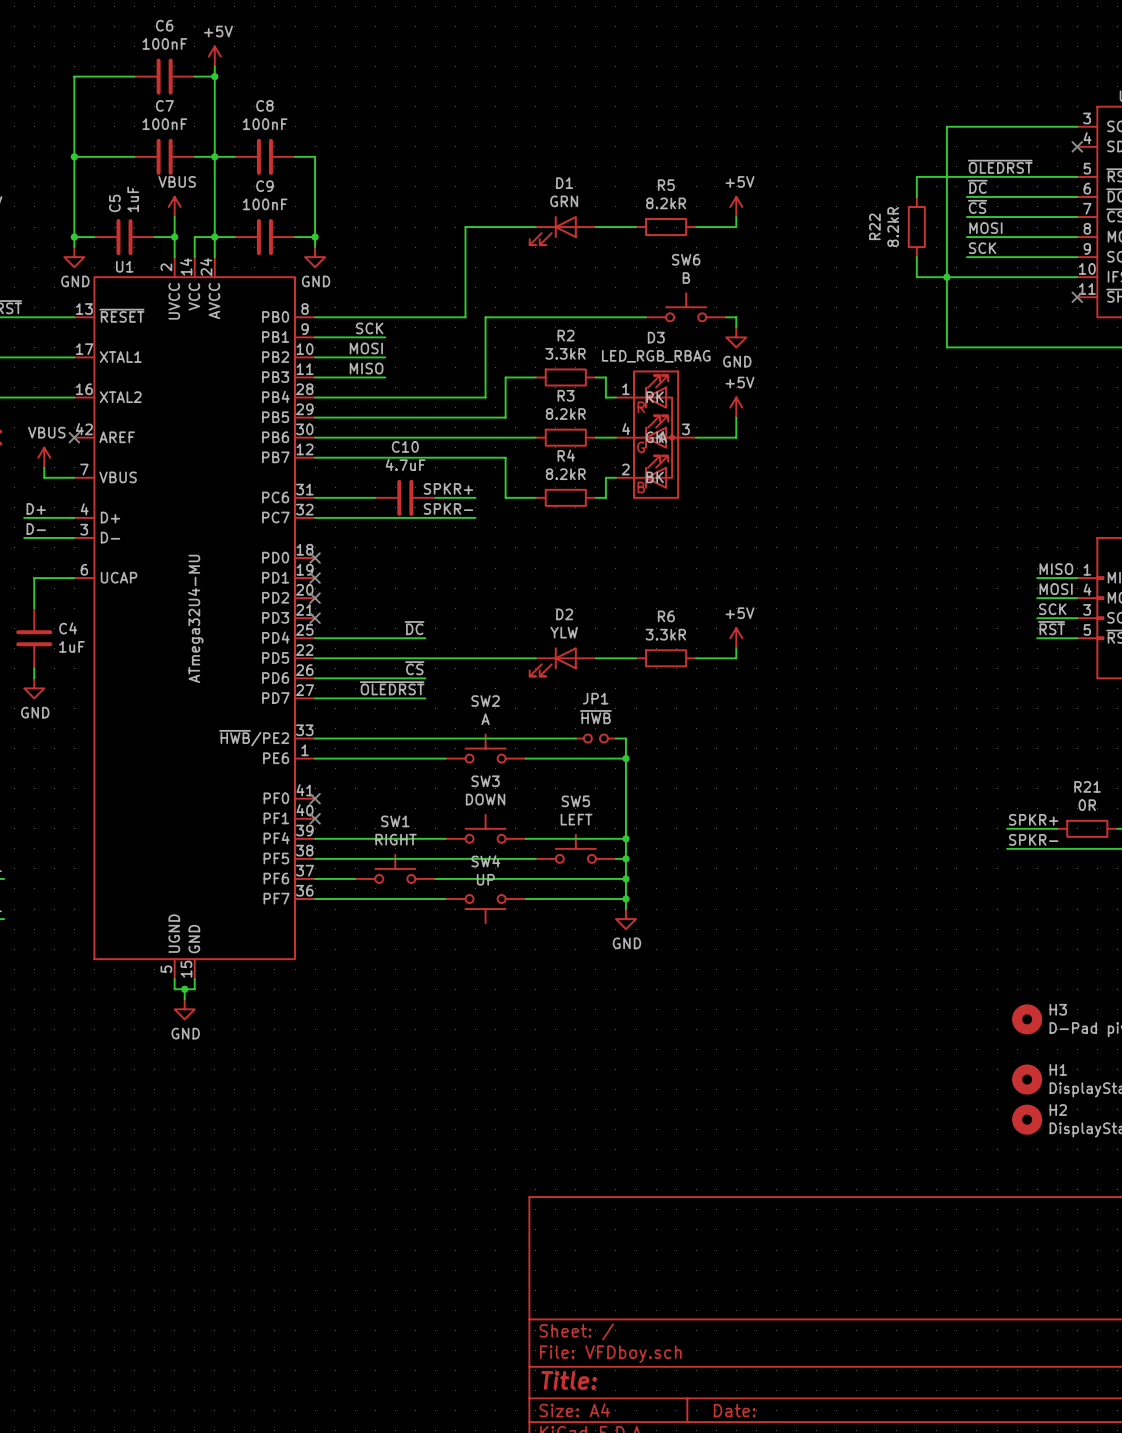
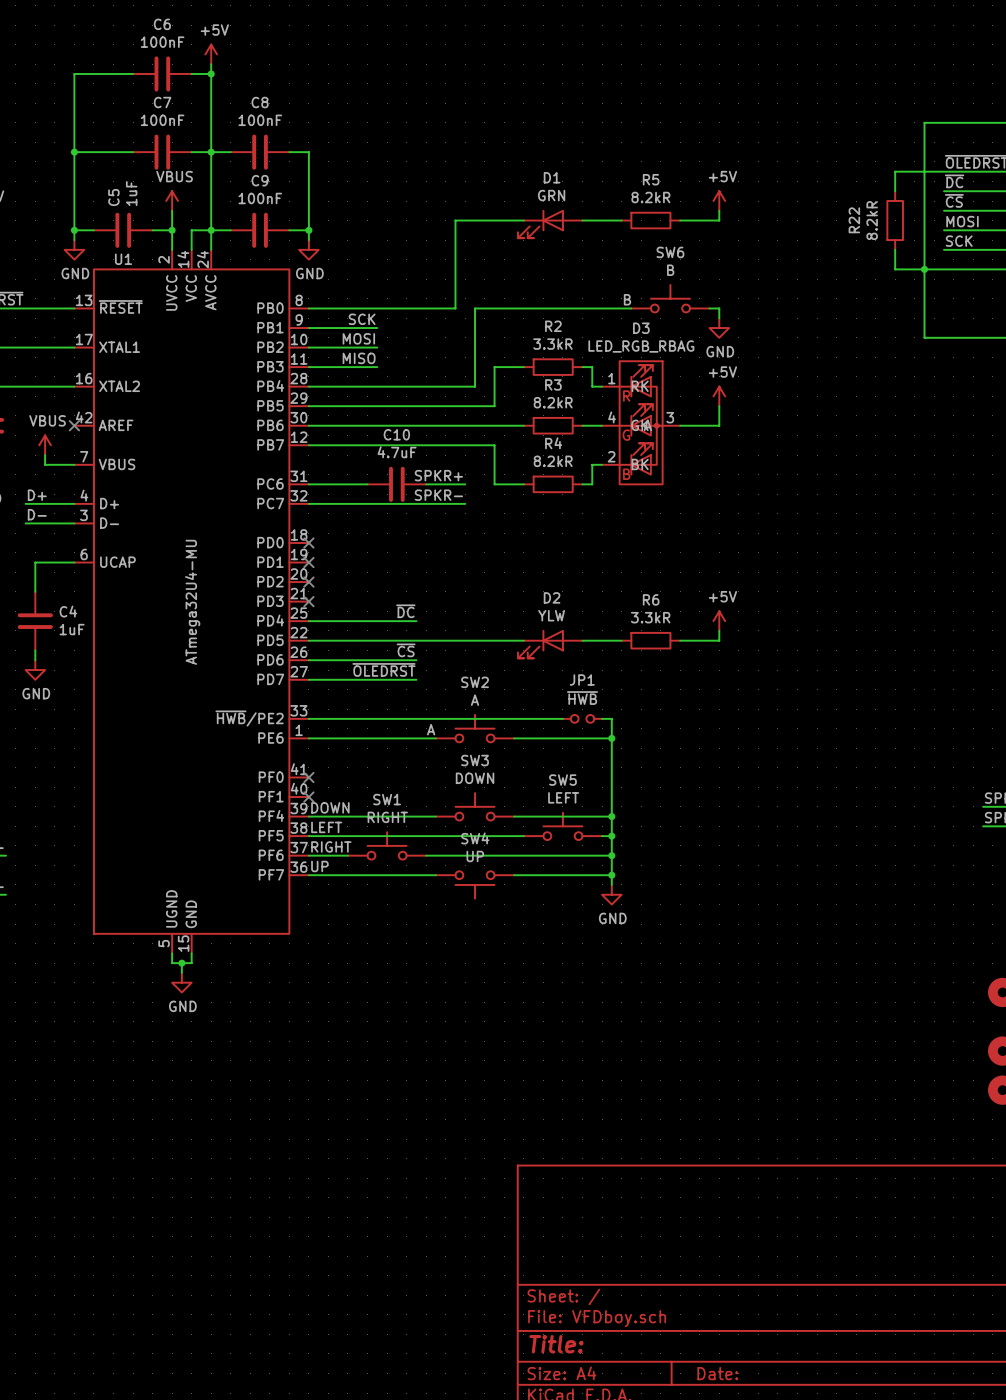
label: none -> B (627, 299)
label: none -> A (431, 729)
label: none -> DOWN (330, 807)
label: none -> LEFT (326, 827)
label: none -> RIGHT (331, 846)
label: none -> UP (319, 866)

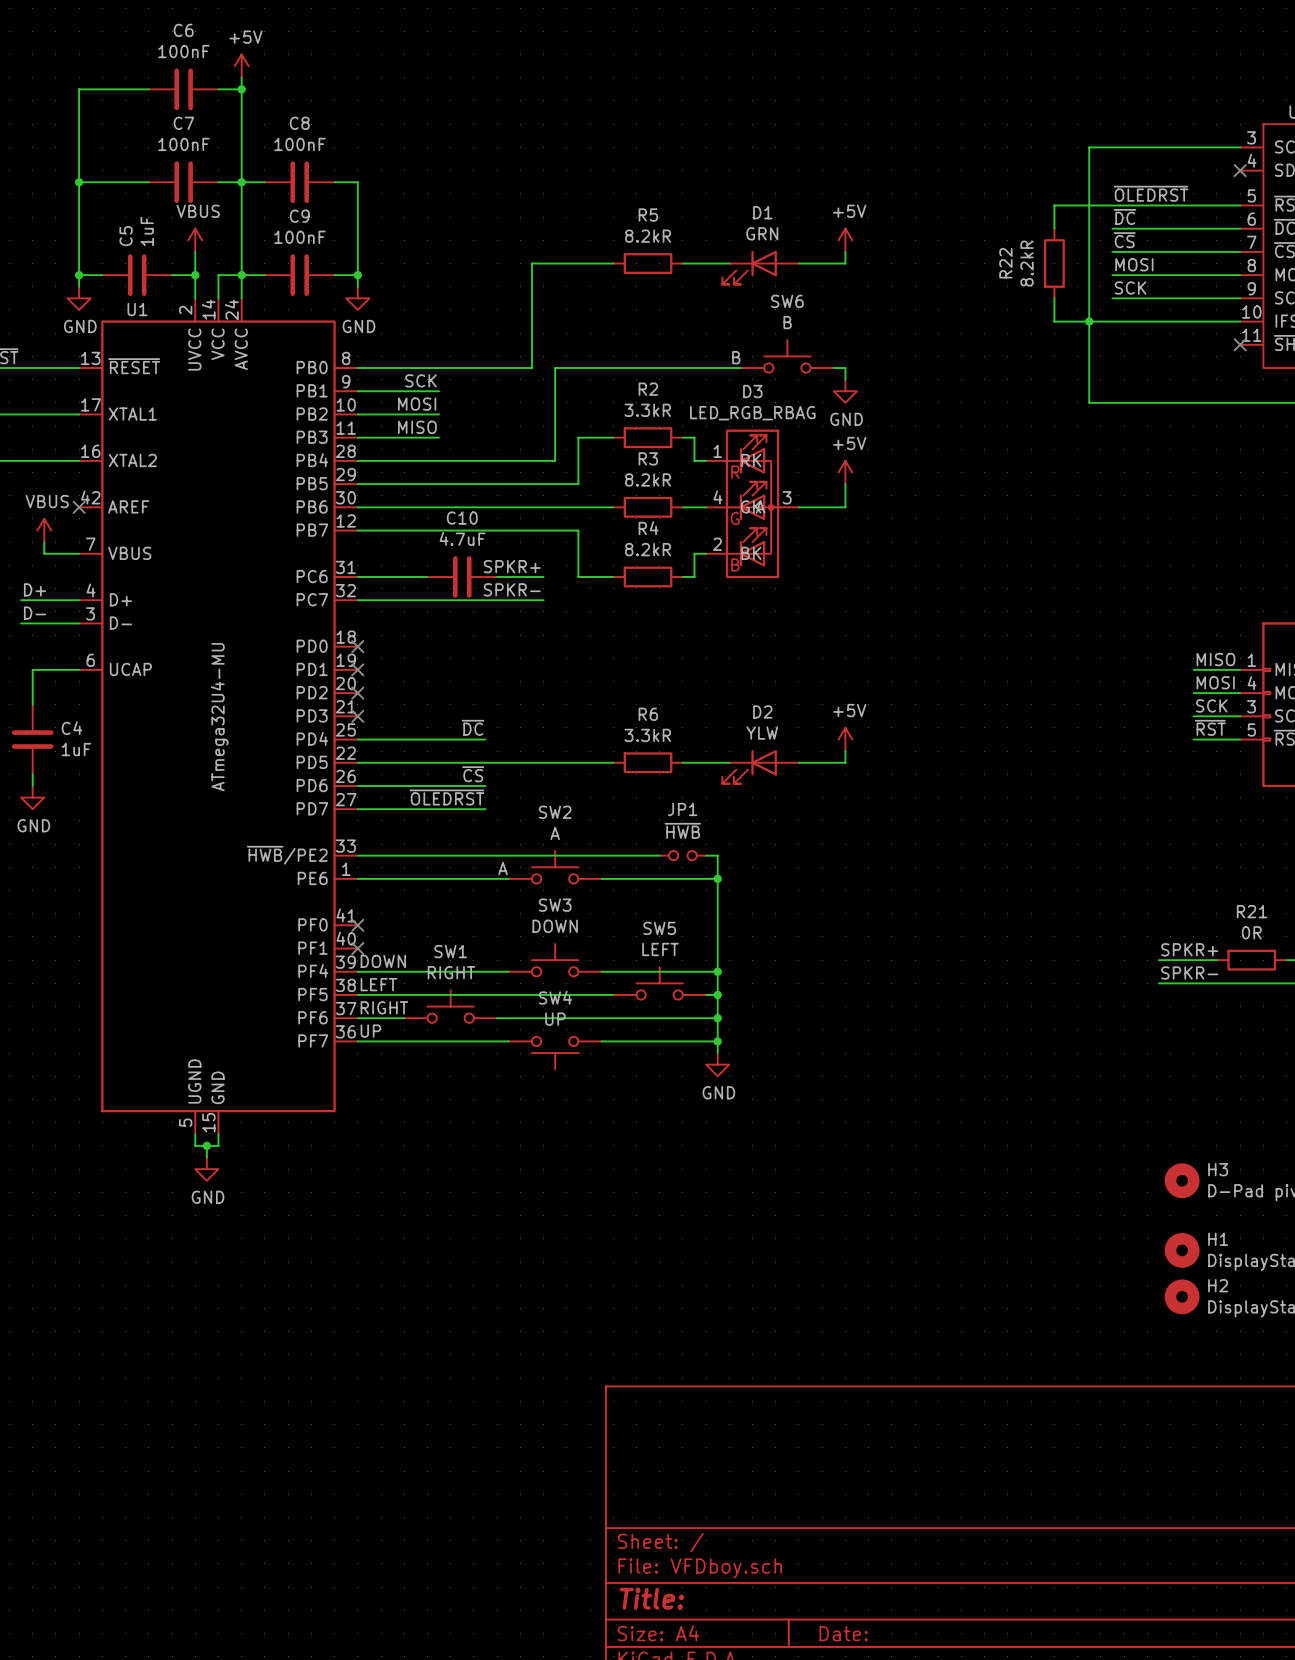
R5 position: (650, 220) -> (648, 263)
D1 position: (550, 223) -> (760, 267)
R6 position: (650, 640) -> (648, 762)
D2 position: (550, 644) -> (760, 766)

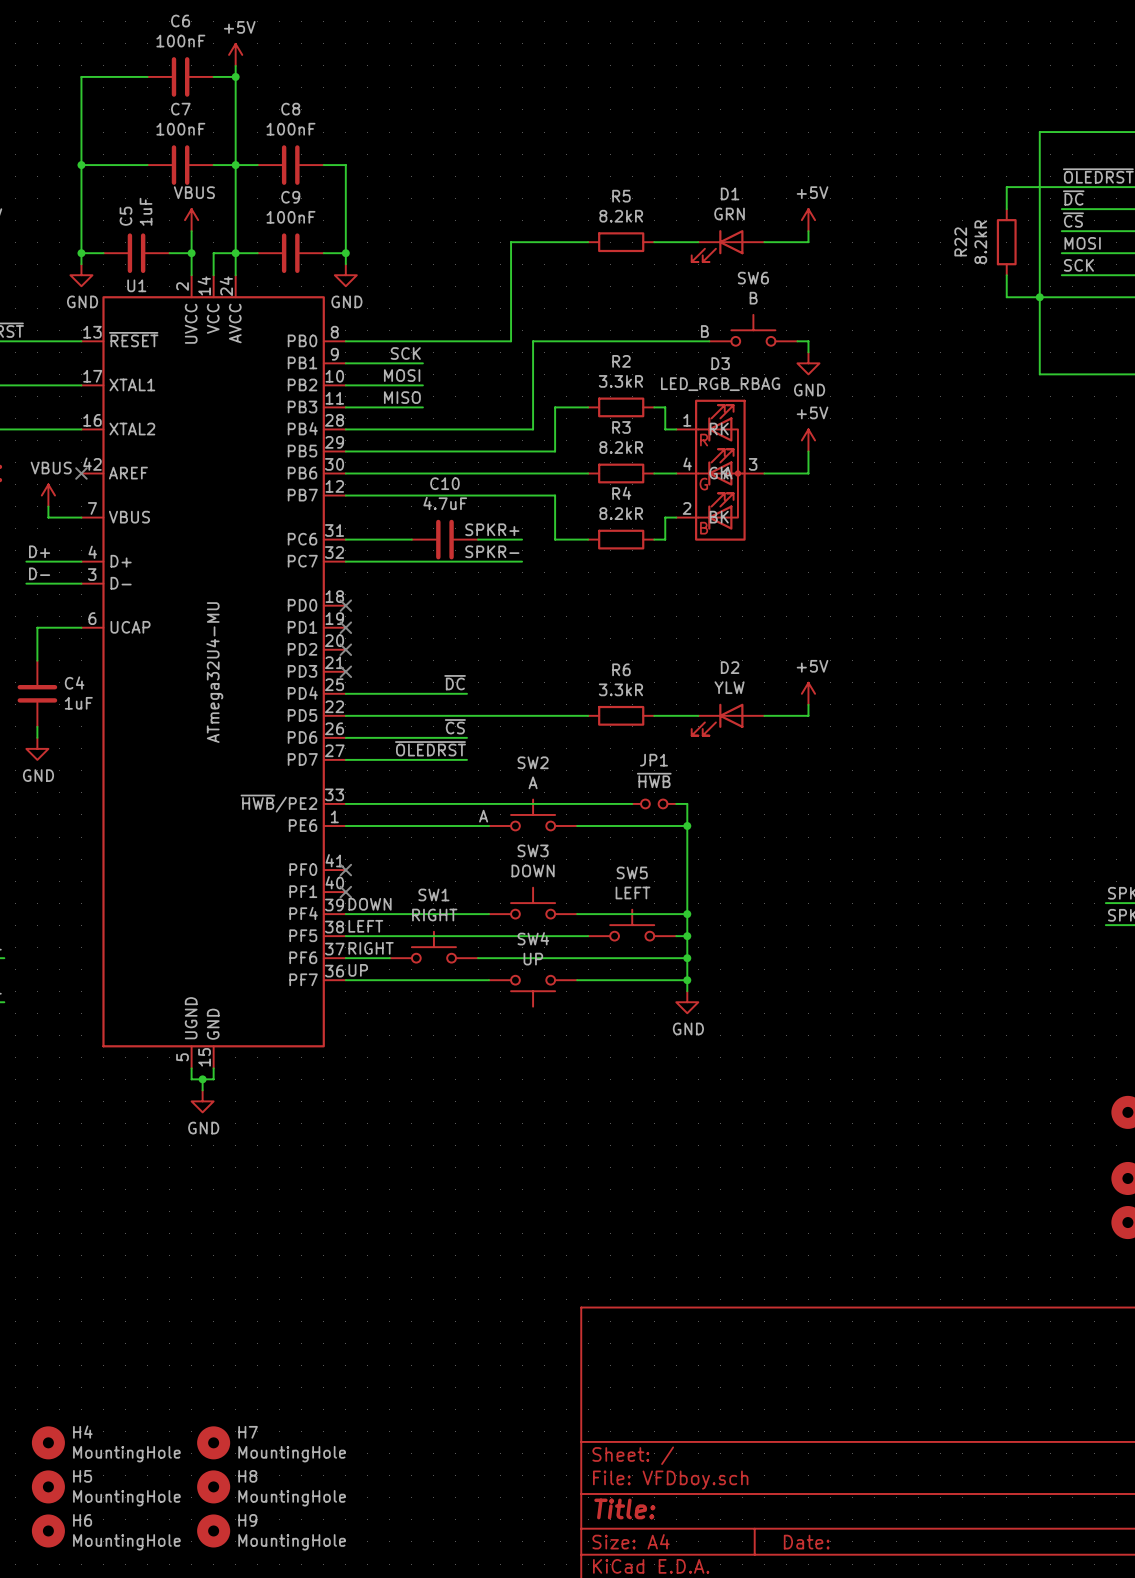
H4: none -> MountingHole (48, 1442)
H7: none -> MountingHole (213, 1442)
H5: none -> MountingHole (48, 1486)
H8: none -> MountingHole (213, 1486)
H6: none -> MountingHole (48, 1530)
H9: none -> MountingHole (213, 1530)

